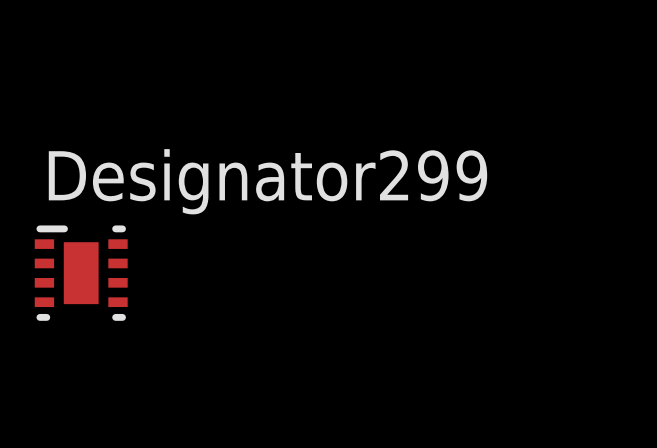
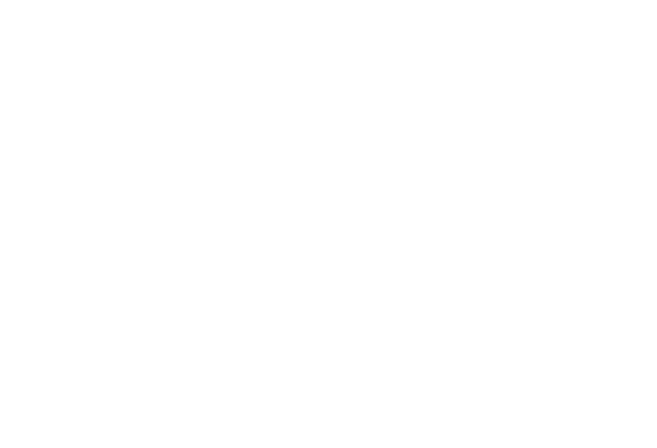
part: (81, 273) -> none

